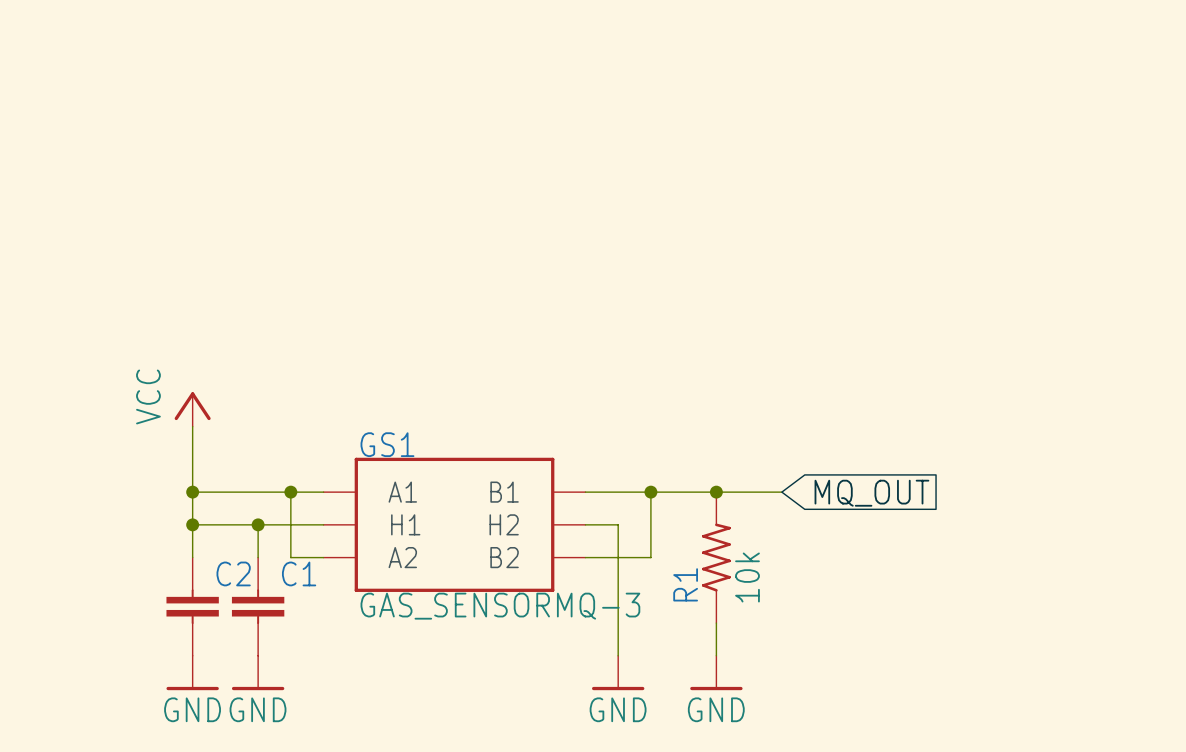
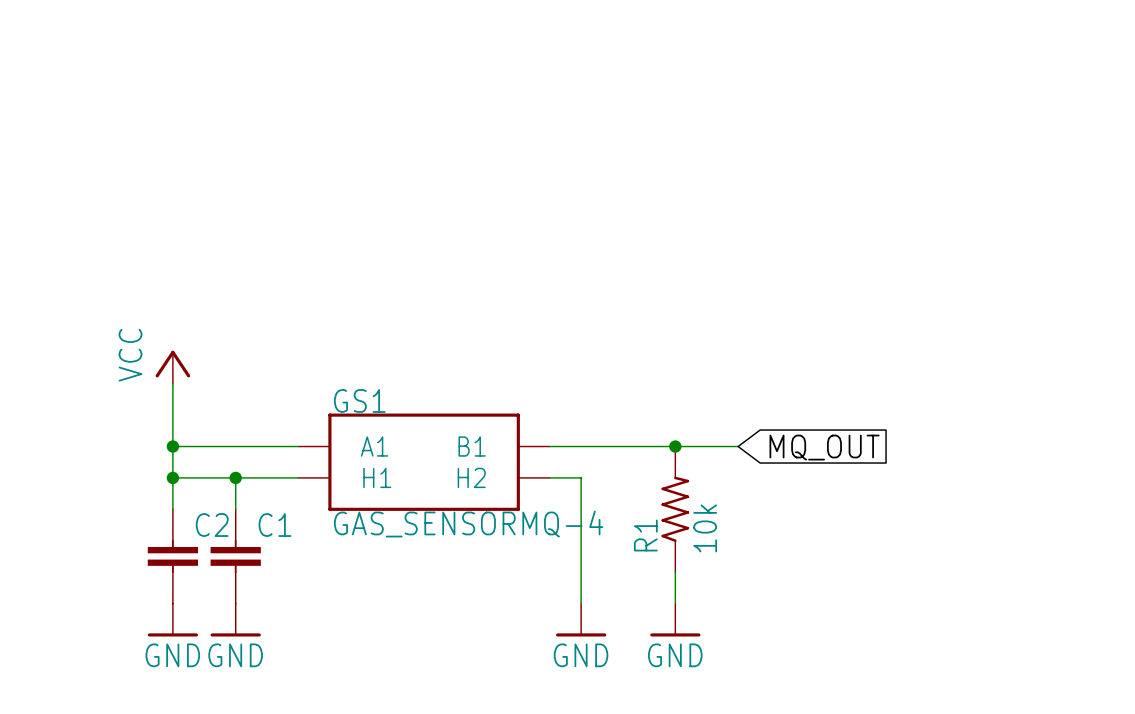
GS1 symbol: [323, 457, 586, 592] -> [298, 413, 550, 511]
wire: (290, 492) (290, 557) (323, 557) -> none
junction: (290, 492) -> none
wire: (650, 492) (650, 557) (585, 557) -> none
junction: (650, 492) -> none
GS1 value: GAS_SENSORMQ-3 (500, 606) -> GAS_SENSORMQ-4 (468, 523)

